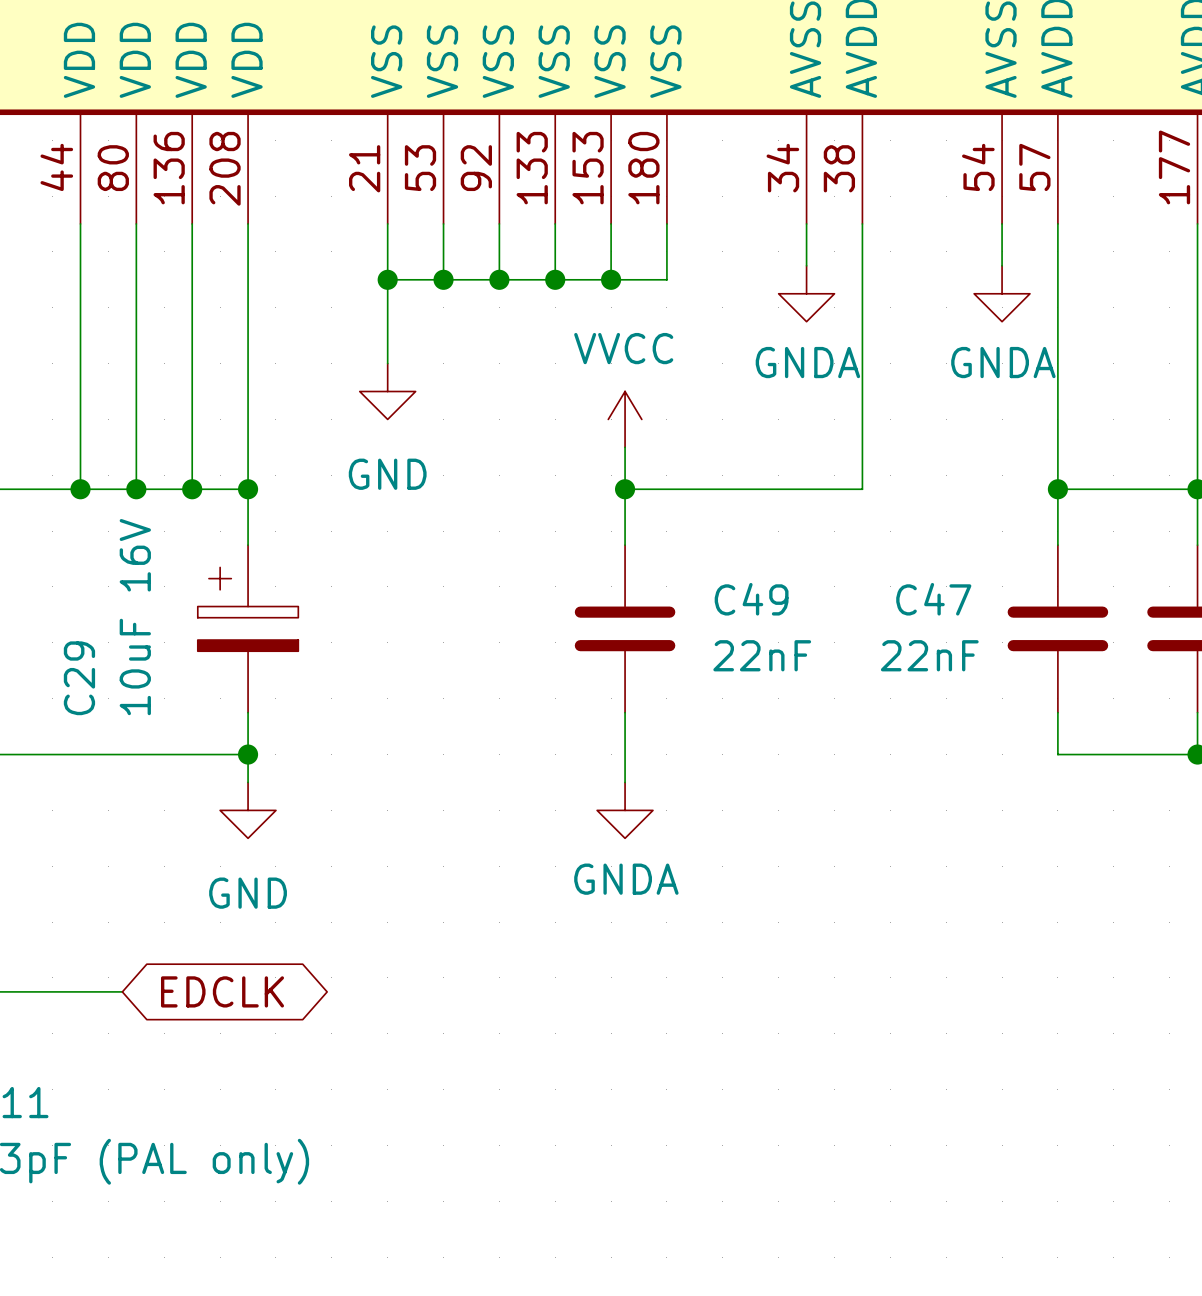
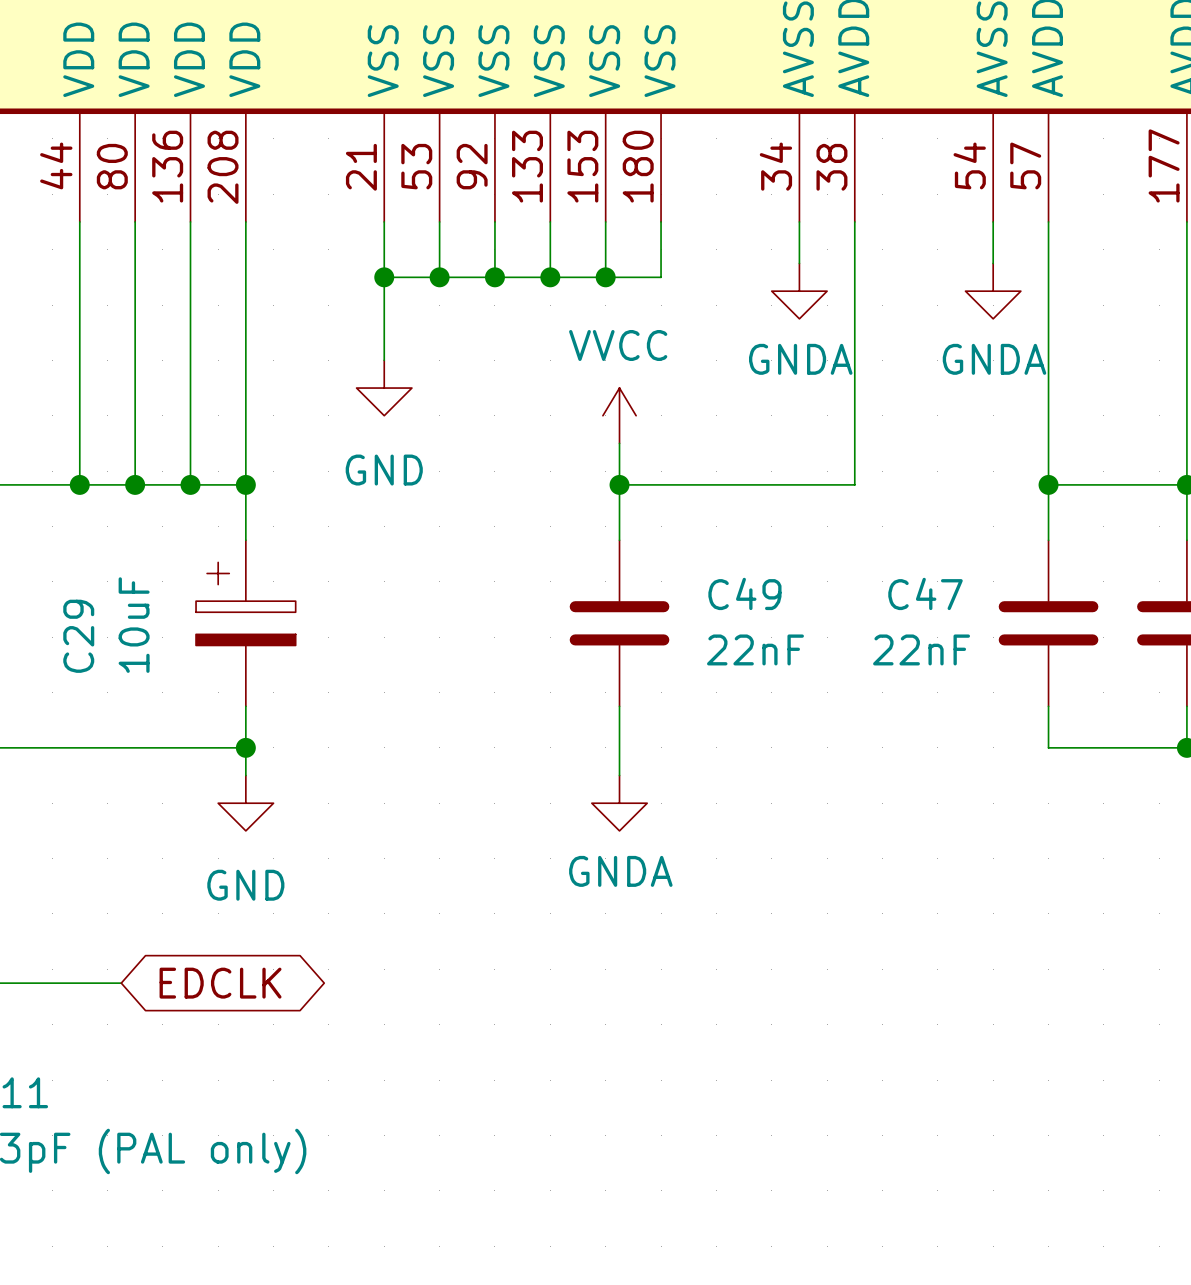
C29 value: 10uF 16V (135, 617) -> 10uF (134, 625)
C29 name position: C29 (79, 678) -> C29 (78, 636)

